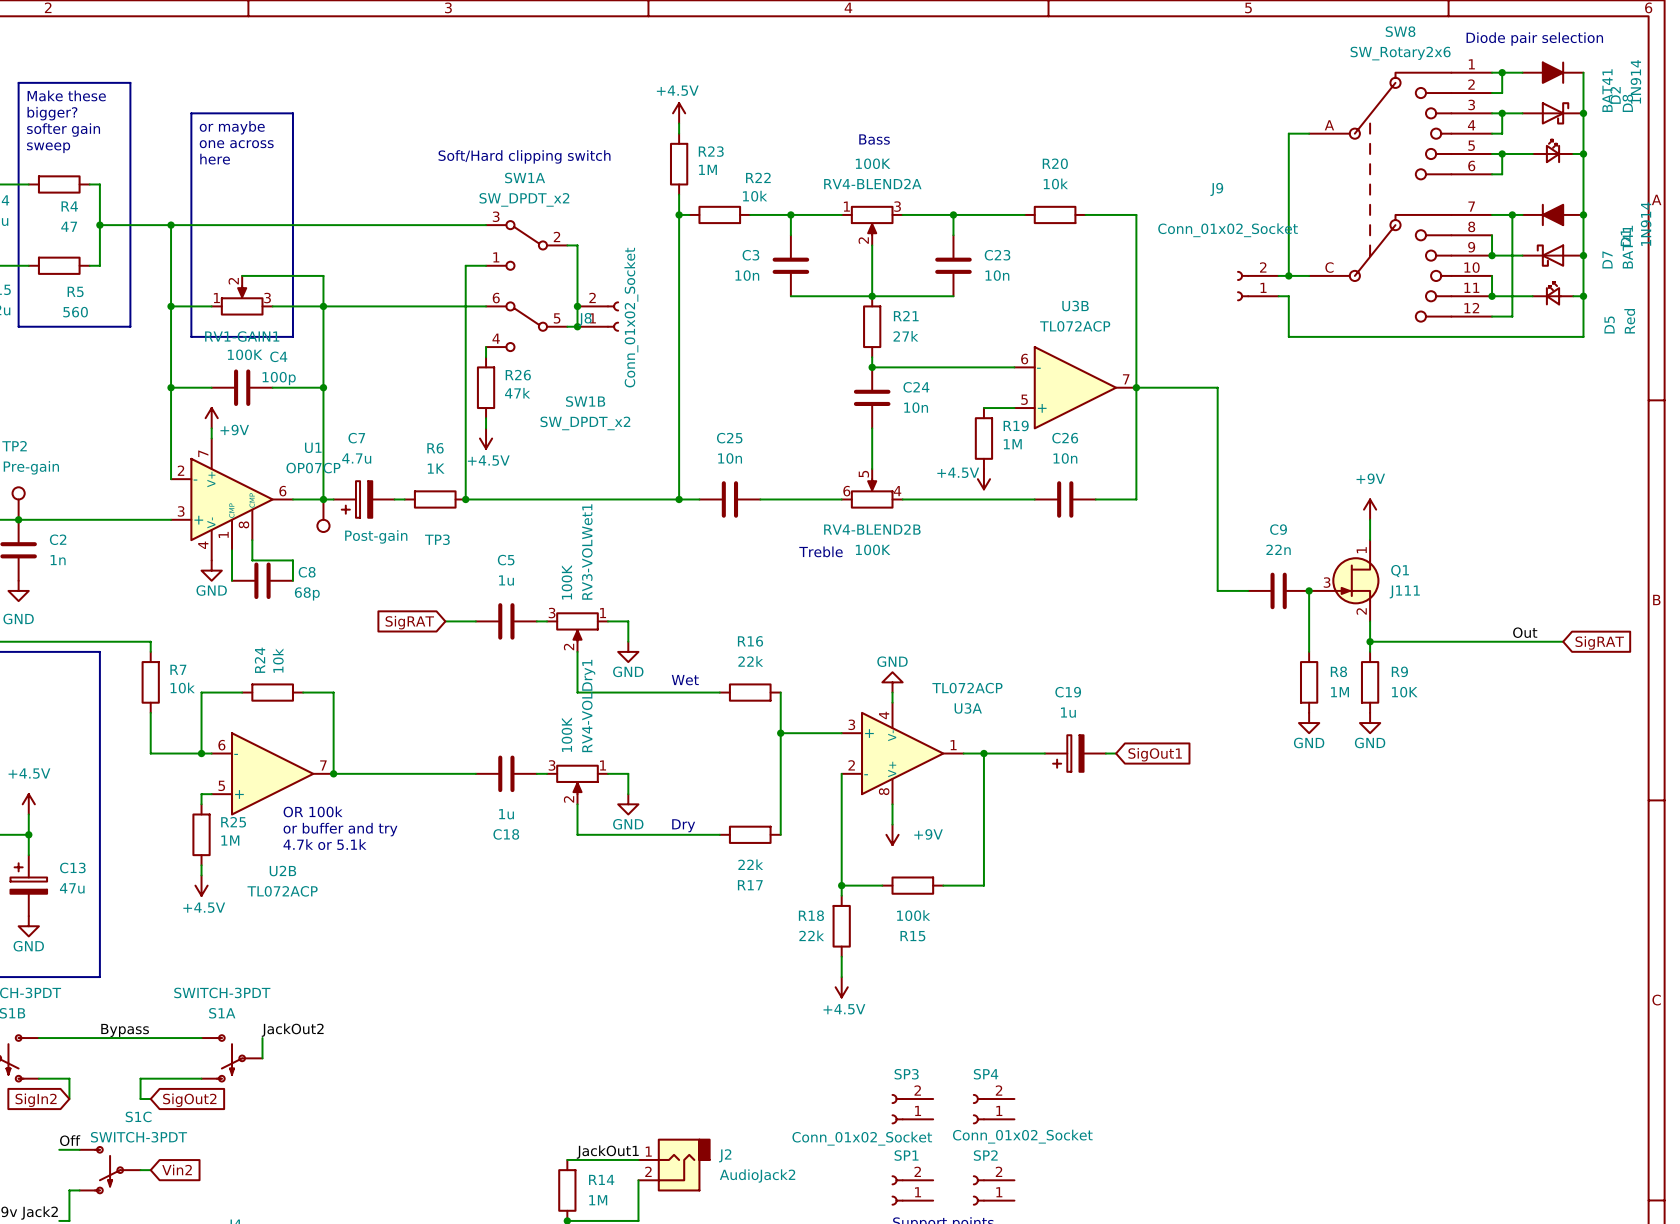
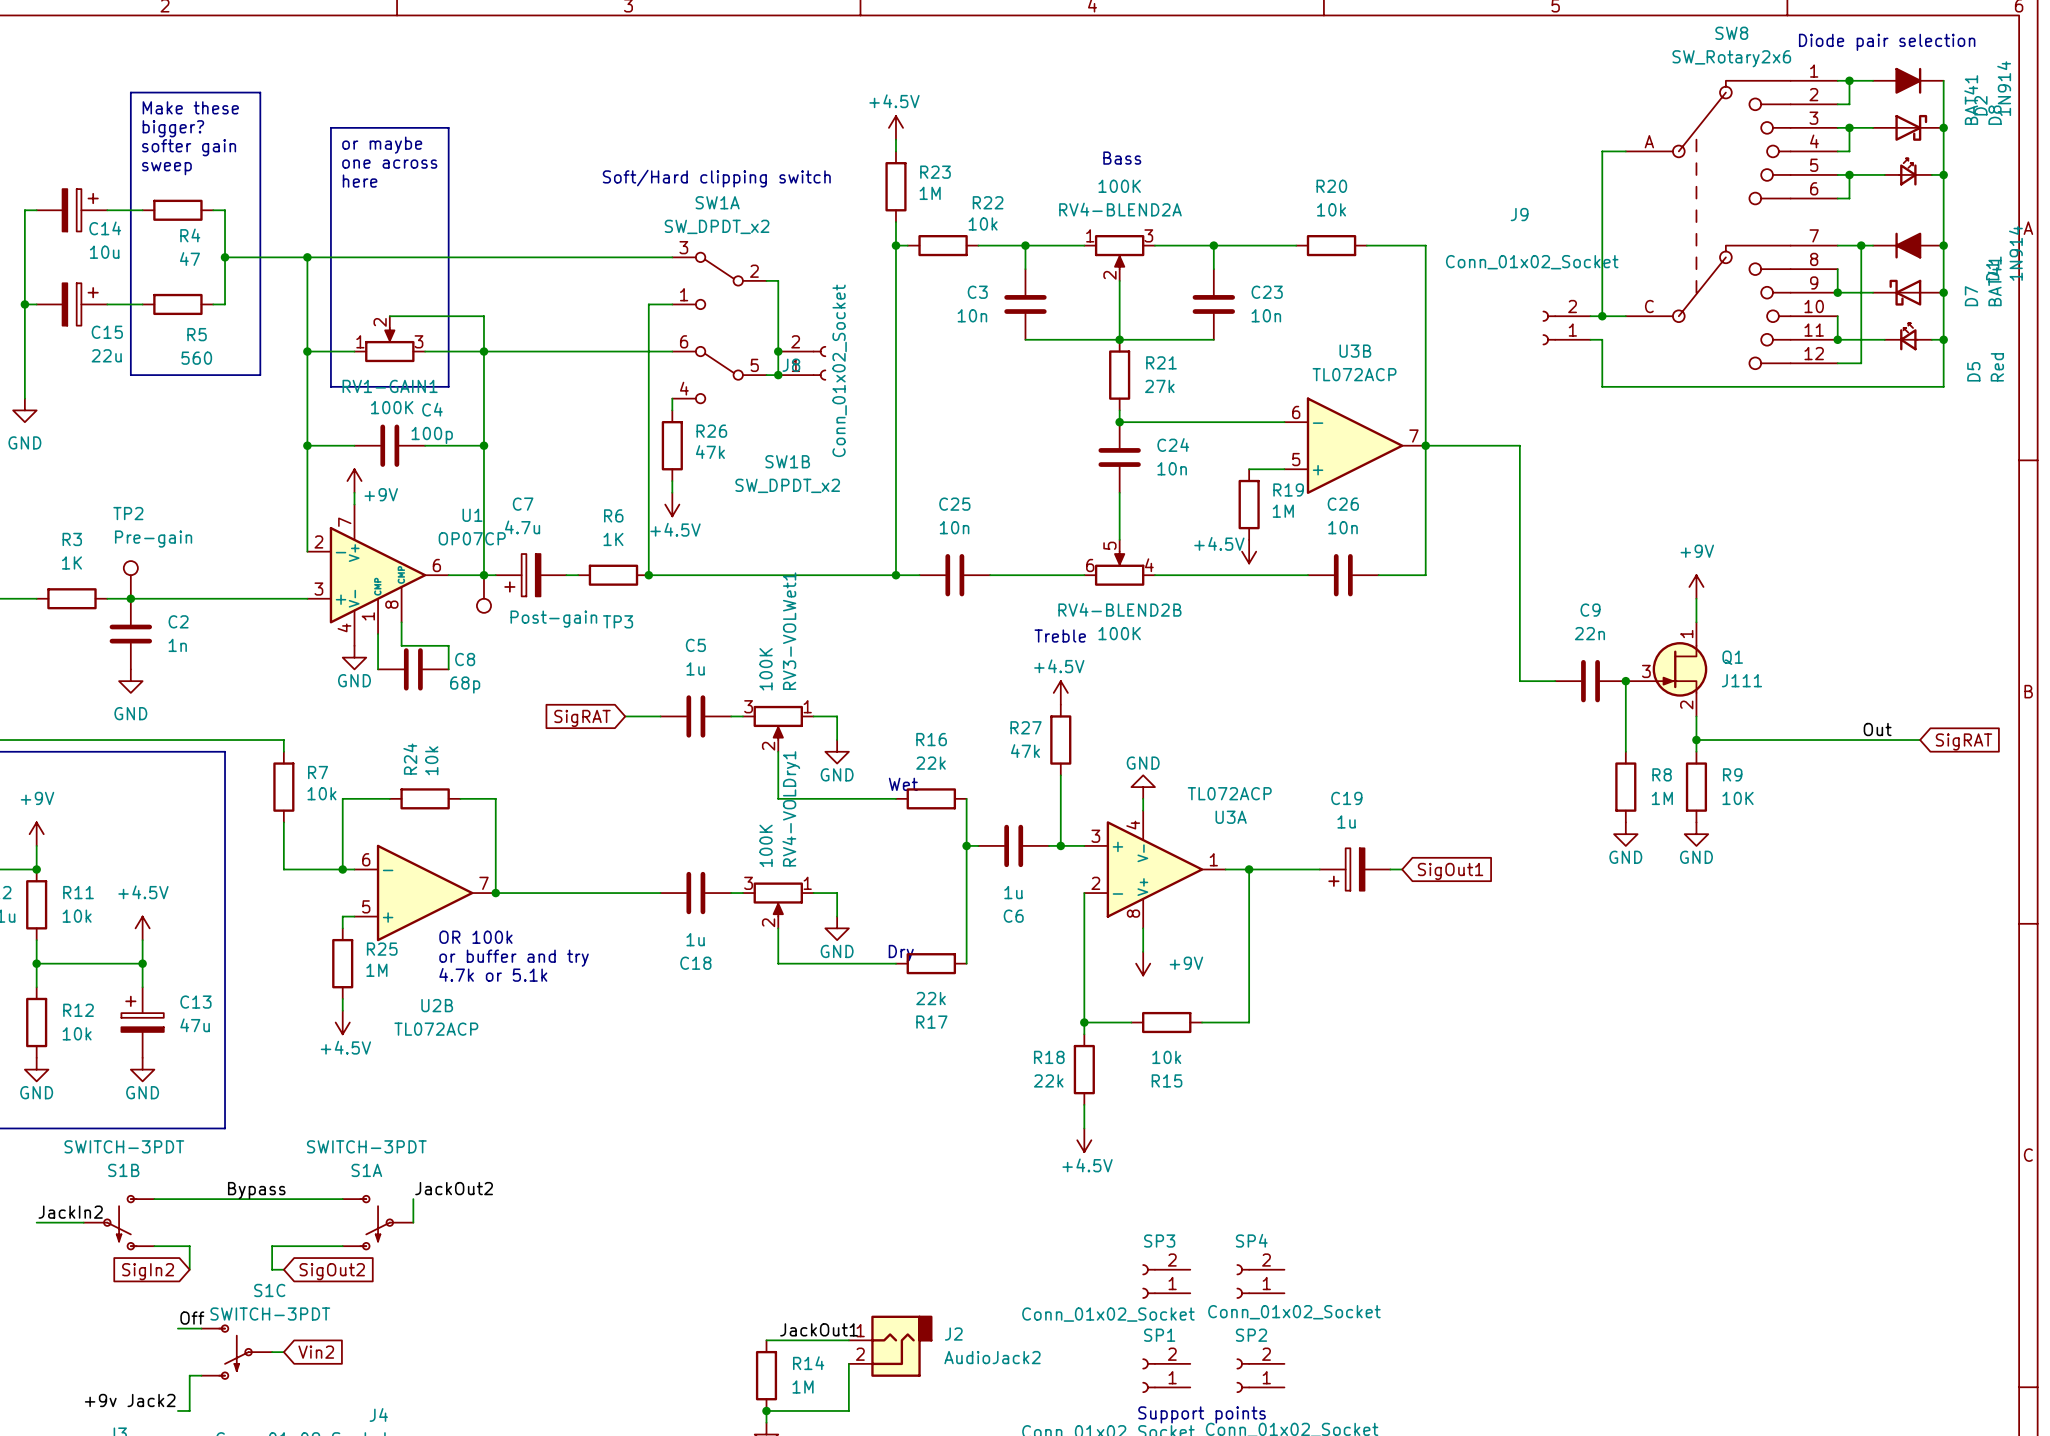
power symbol: none -> +4.5V (1060, 692)
R27: none -> 47k (1060, 740)
wire: none -> (1060, 775) (1060, 845)
wire: (679, 692) (719, 692) -> none
R16 position: (750, 692) -> (931, 798)
wire: (780, 692) (780, 834) -> (966, 798) (966, 963)
wire: none -> (966, 845) (978, 845)
junction: none -> (966, 845)
junction: (780, 733) -> none
C6: none -> 1u (1013, 845)
junction: none -> (1060, 845)
wire: (679, 834) (719, 834) -> none
R17 position: (750, 834) -> (931, 963)
R15 value: 100k (913, 915) -> 10k (1166, 1057)

